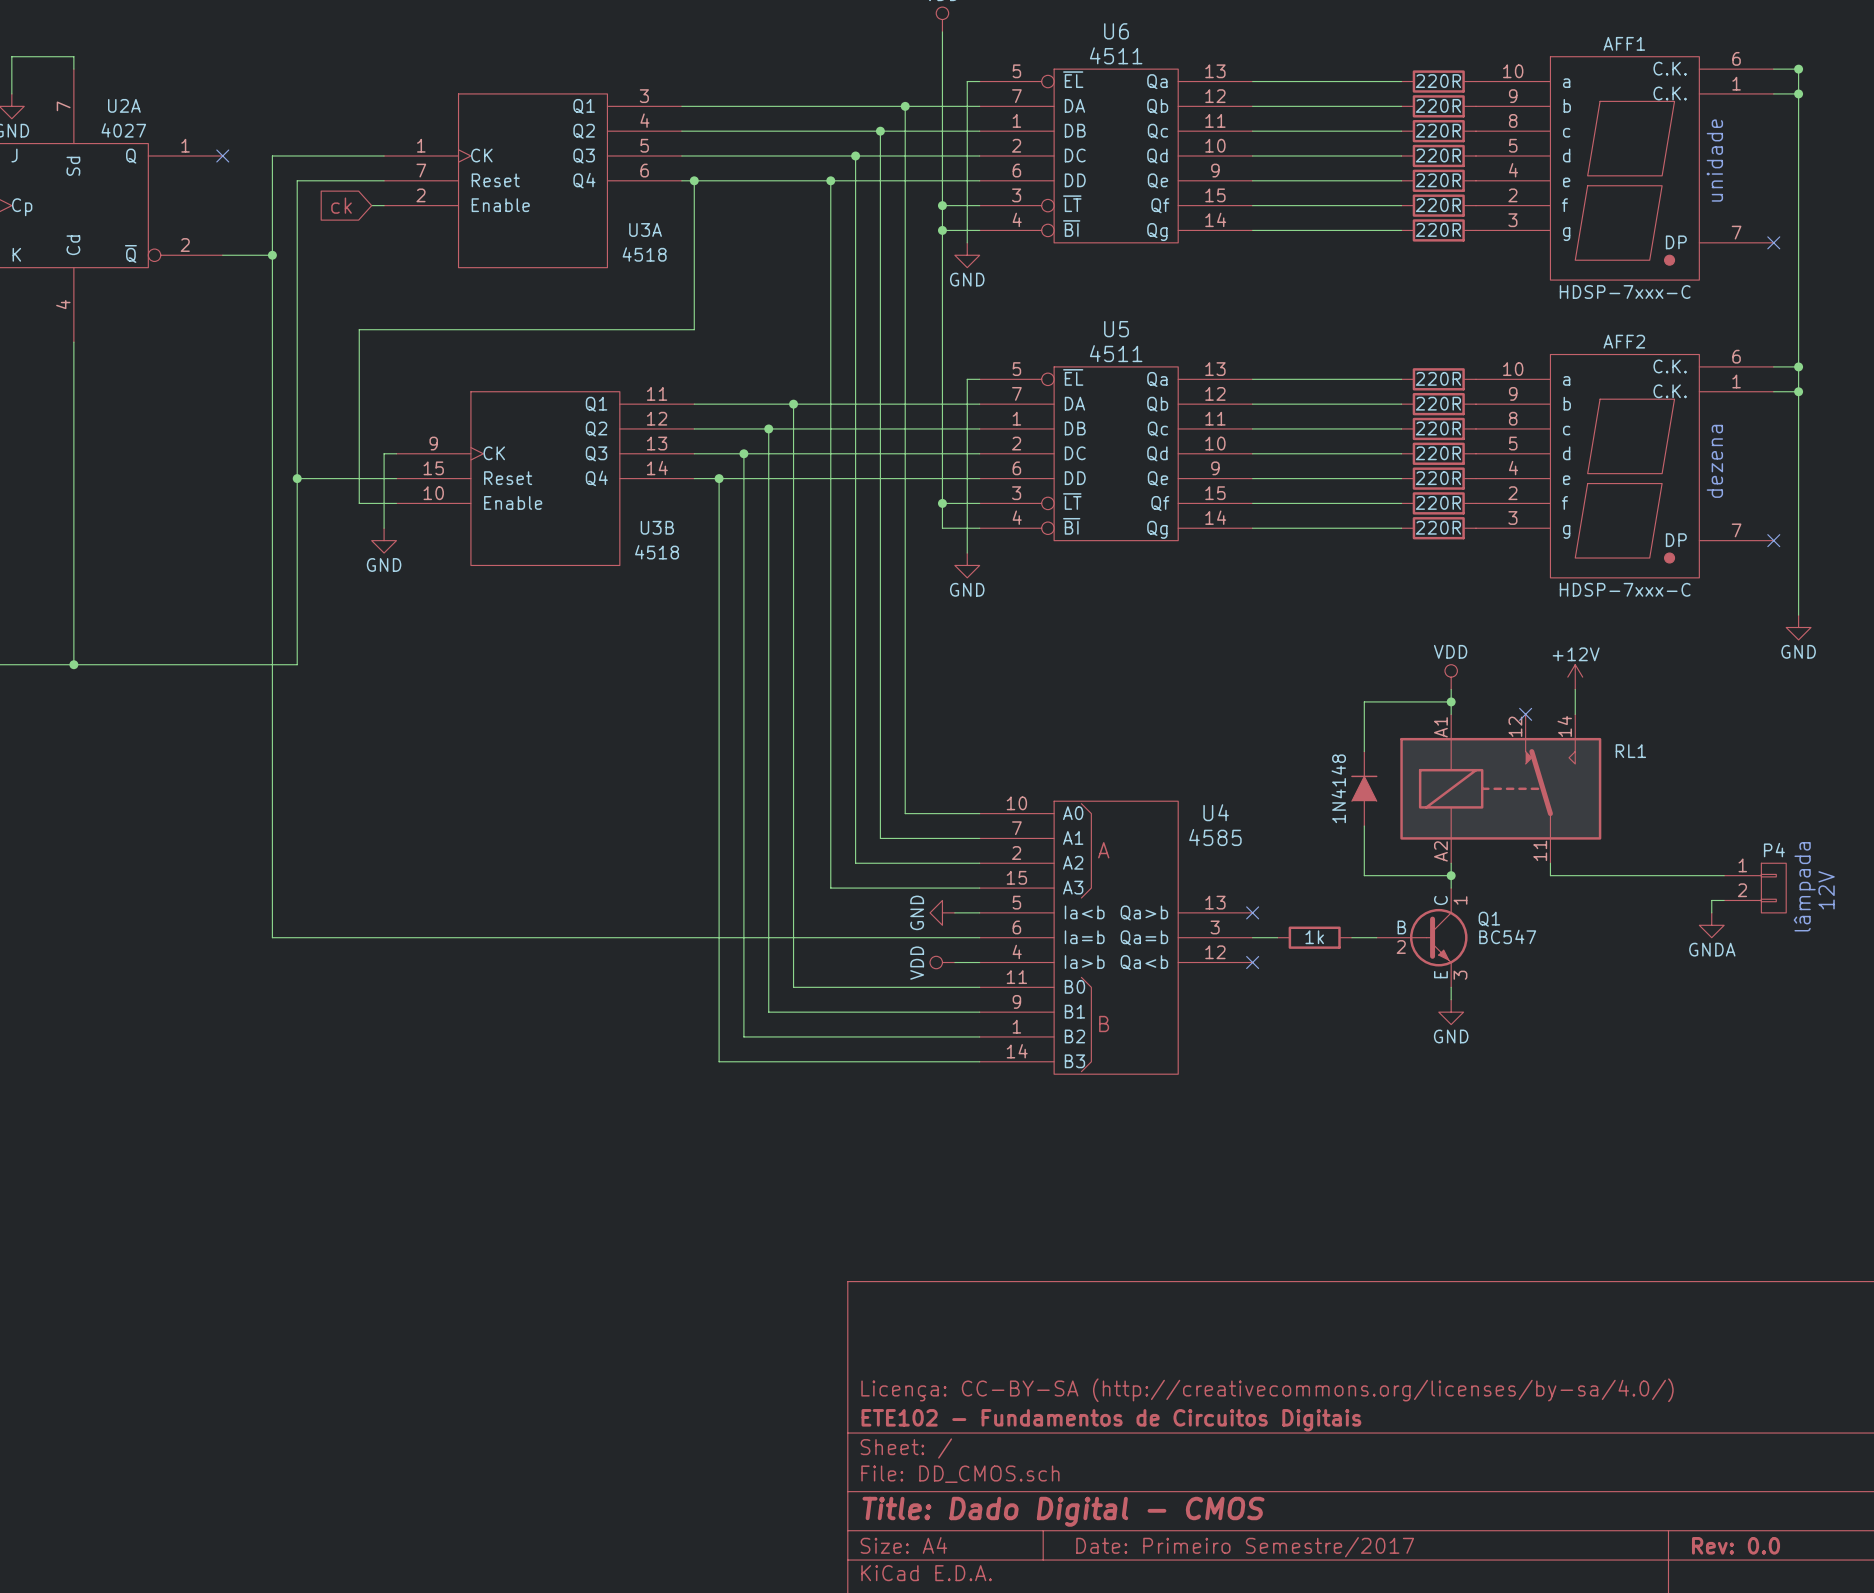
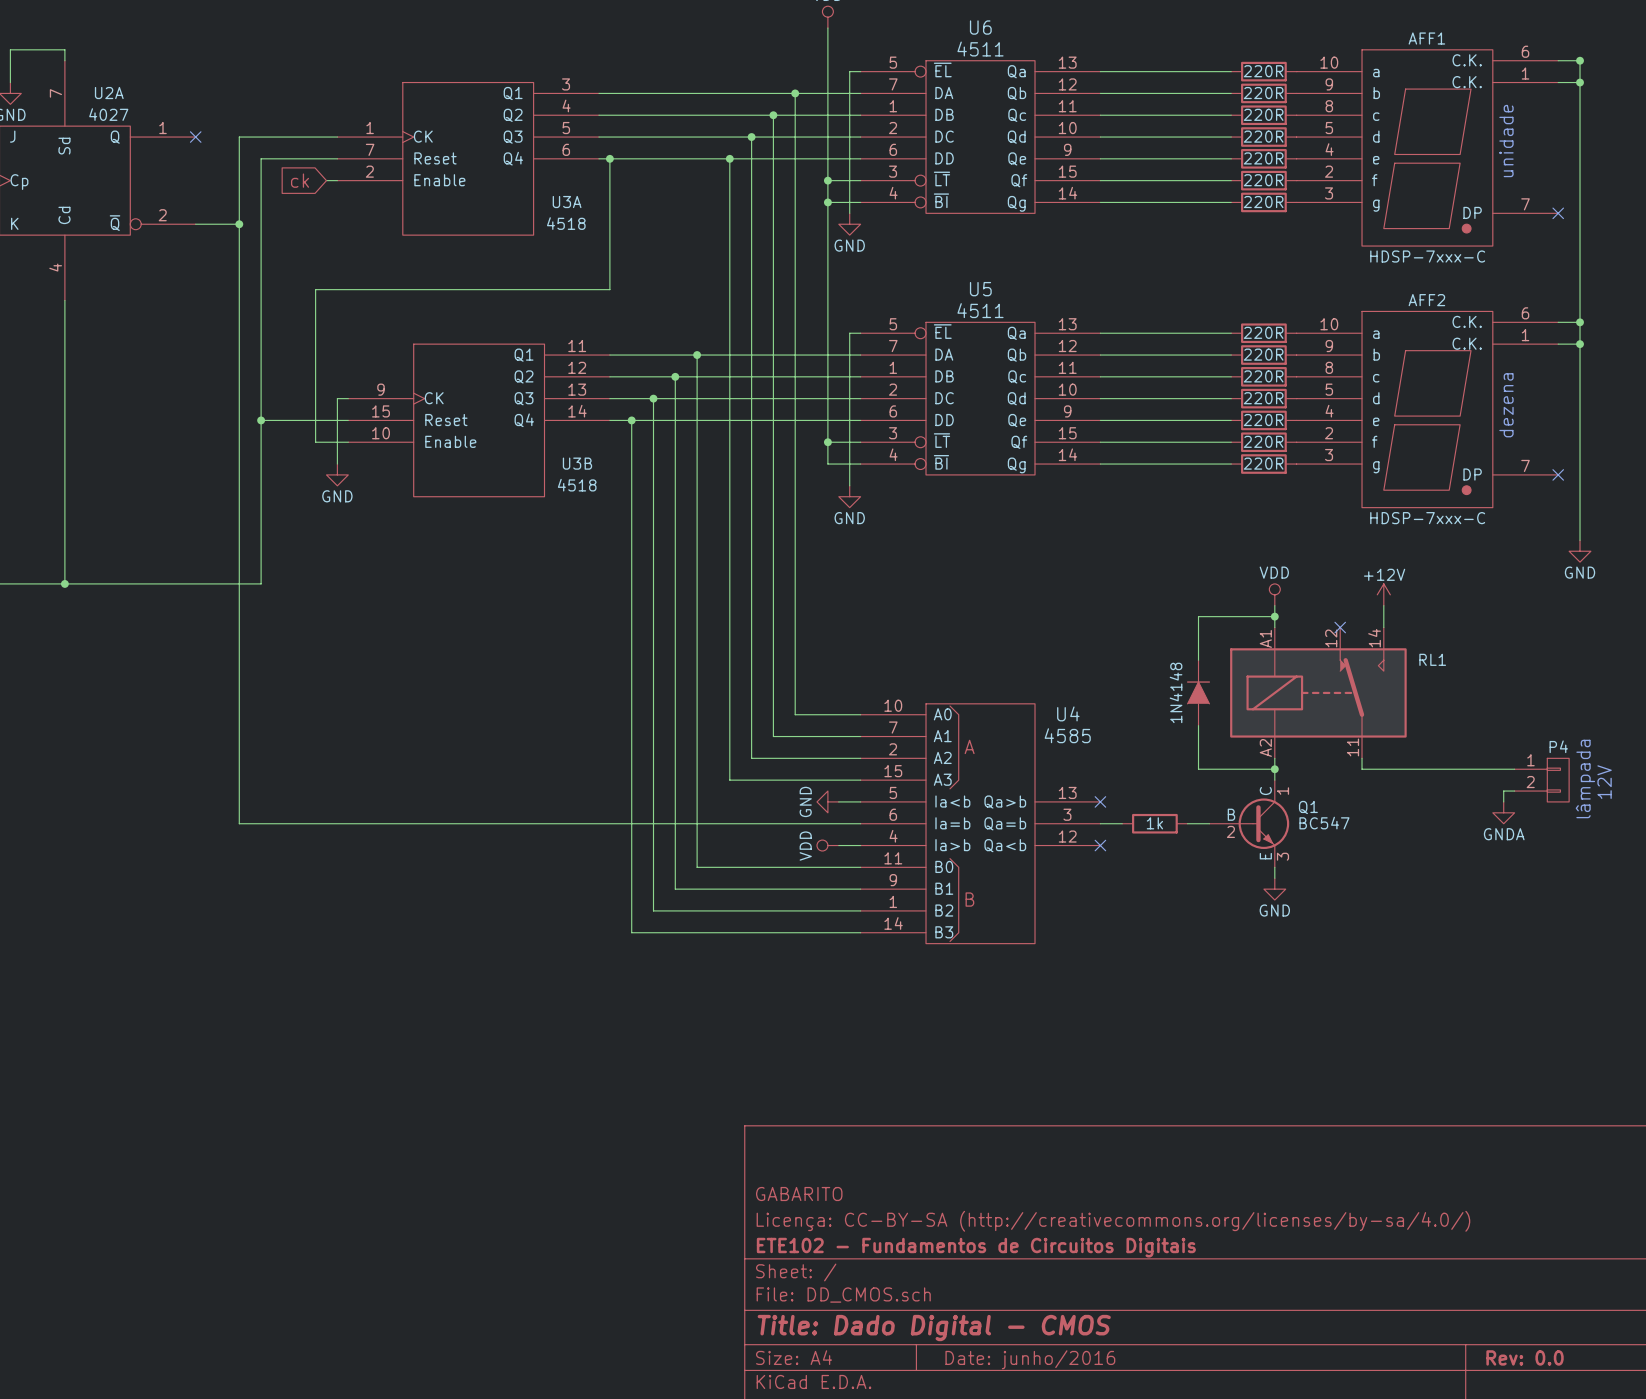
title block: none -> GABARITO (799, 1194)
title block: Date: Primeiro Semestre/2017 (1245, 1547) -> Date: junho/2016 (1030, 1359)

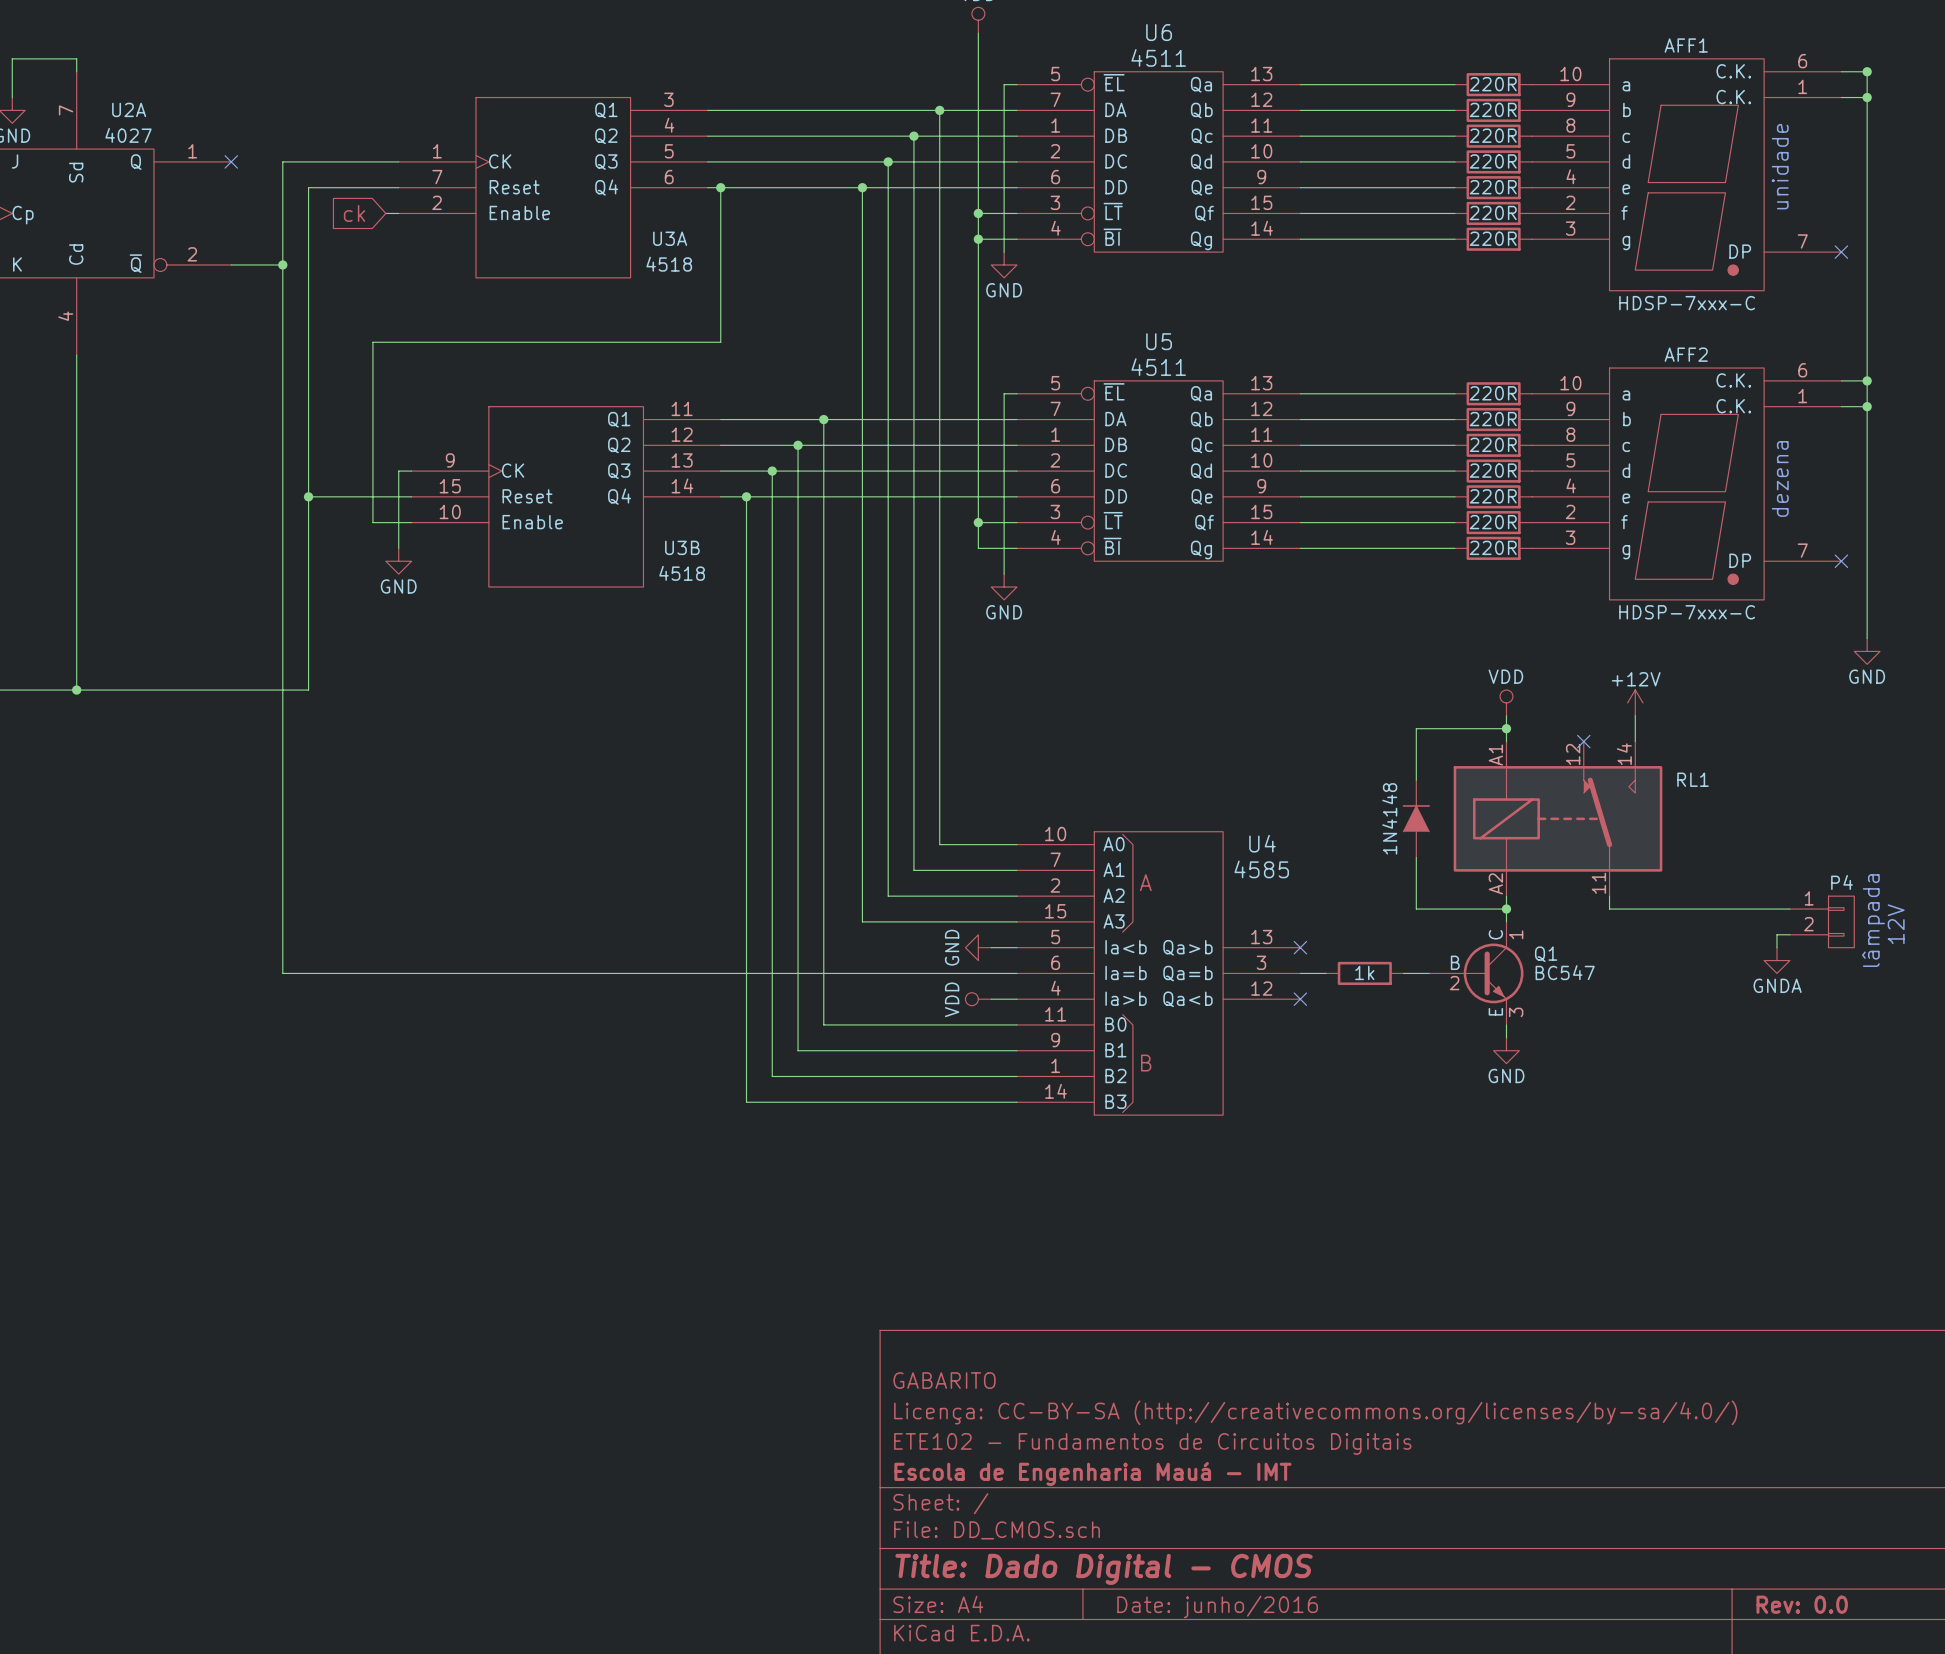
title block: none -> GABARITO (944, 1380)
title block: GABARITO (799, 1194) -> Licença: CC-BY-SA (http://creativecommons.org/licenses/by-sa/4.0/) (1315, 1412)
title block: Licença: CC-BY-SA (http://creativecommons.org/licenses/by-sa/4.0/) (1113, 1221) -> ETE102 - Fundamentos de Circuitos Digitais (1152, 1443)
title block: ETE102 - Fundamentos de Circuitos Digitais (976, 1247) -> Escola de Engenharia Mauá - IMT (1092, 1474)

